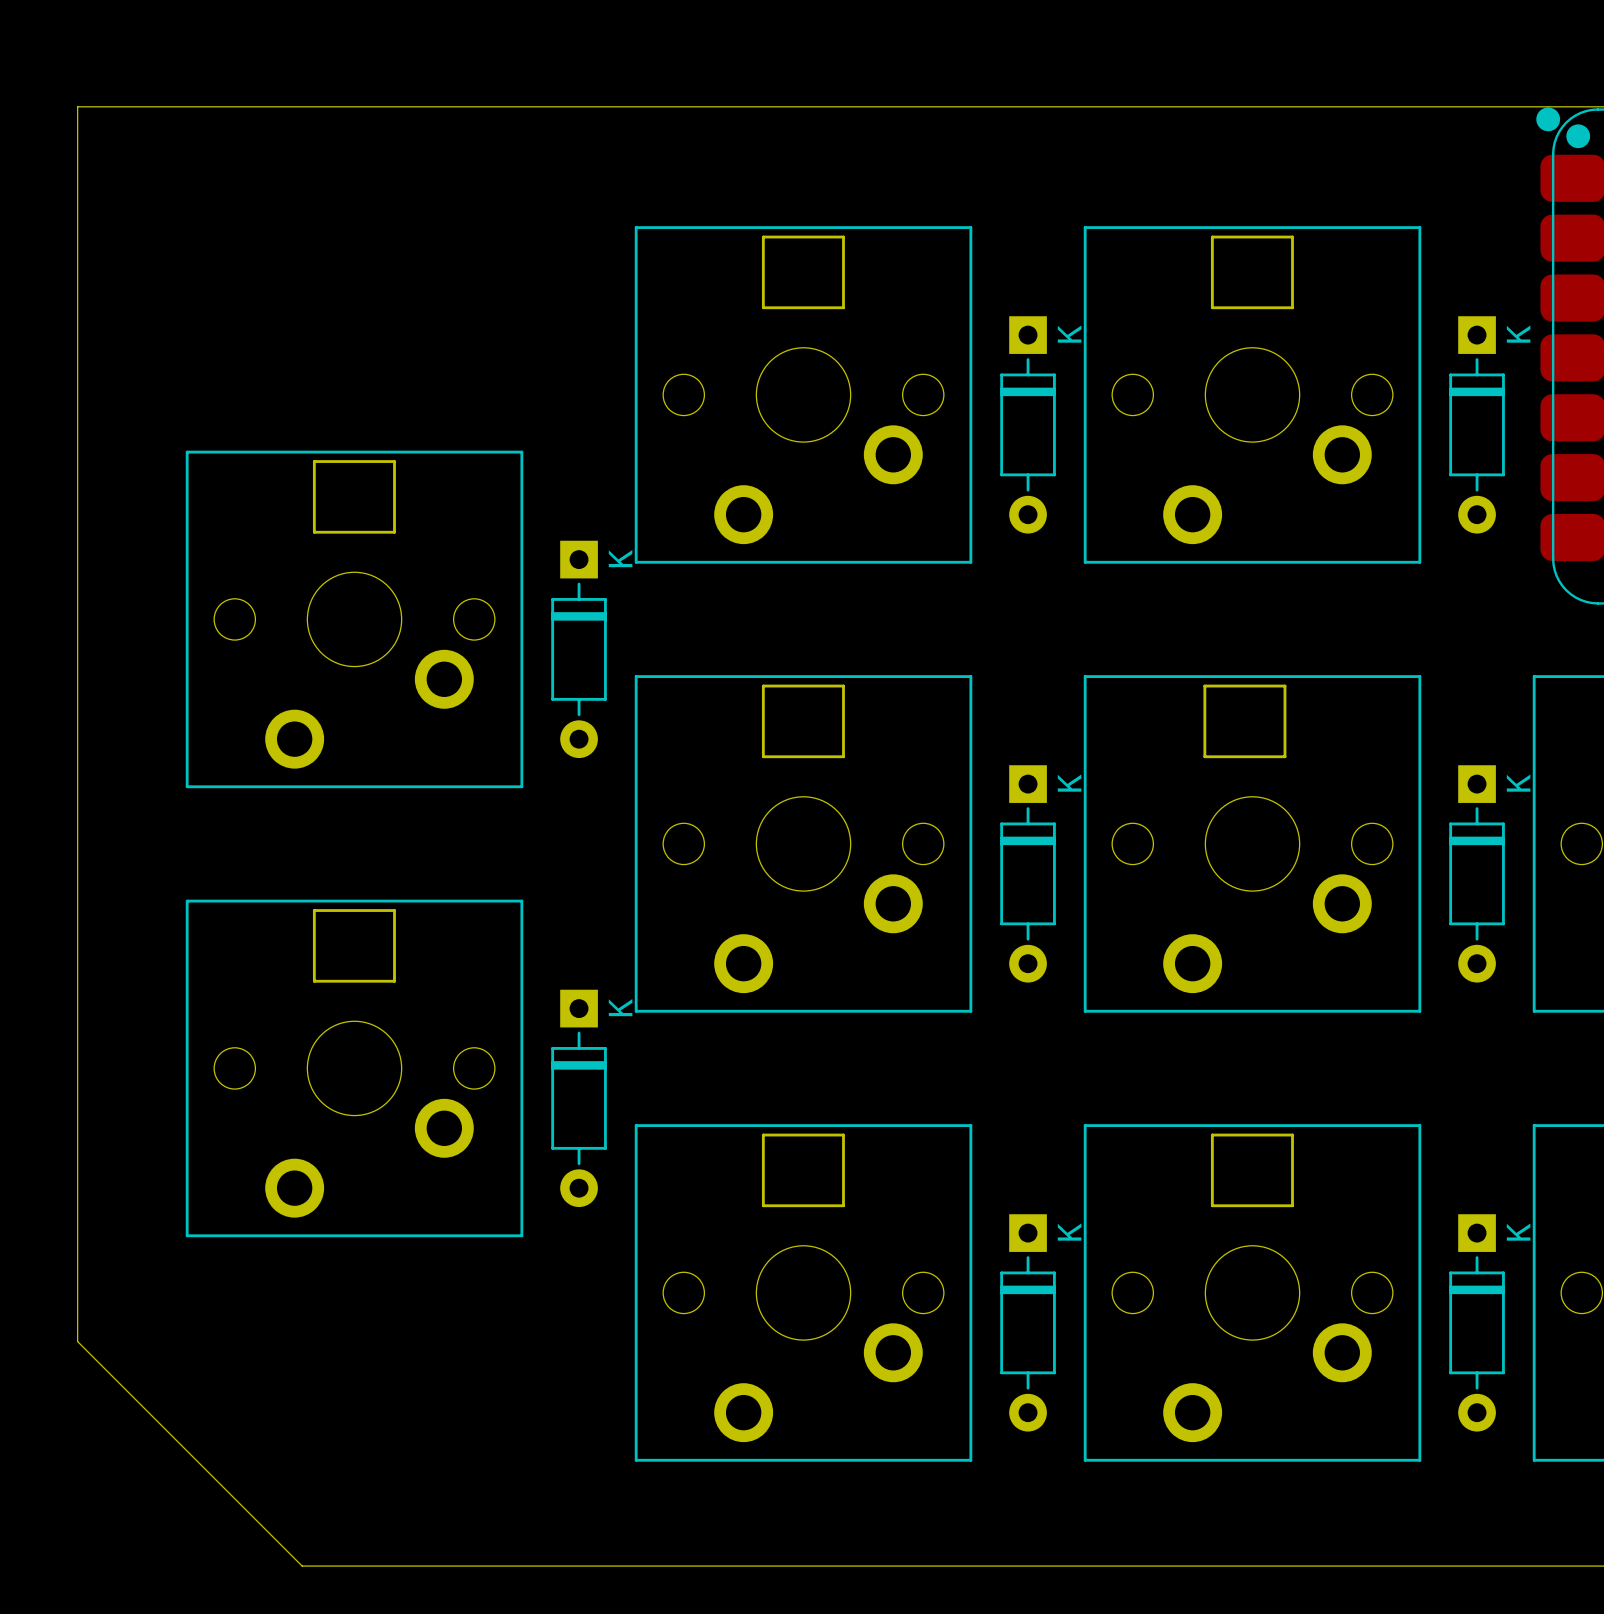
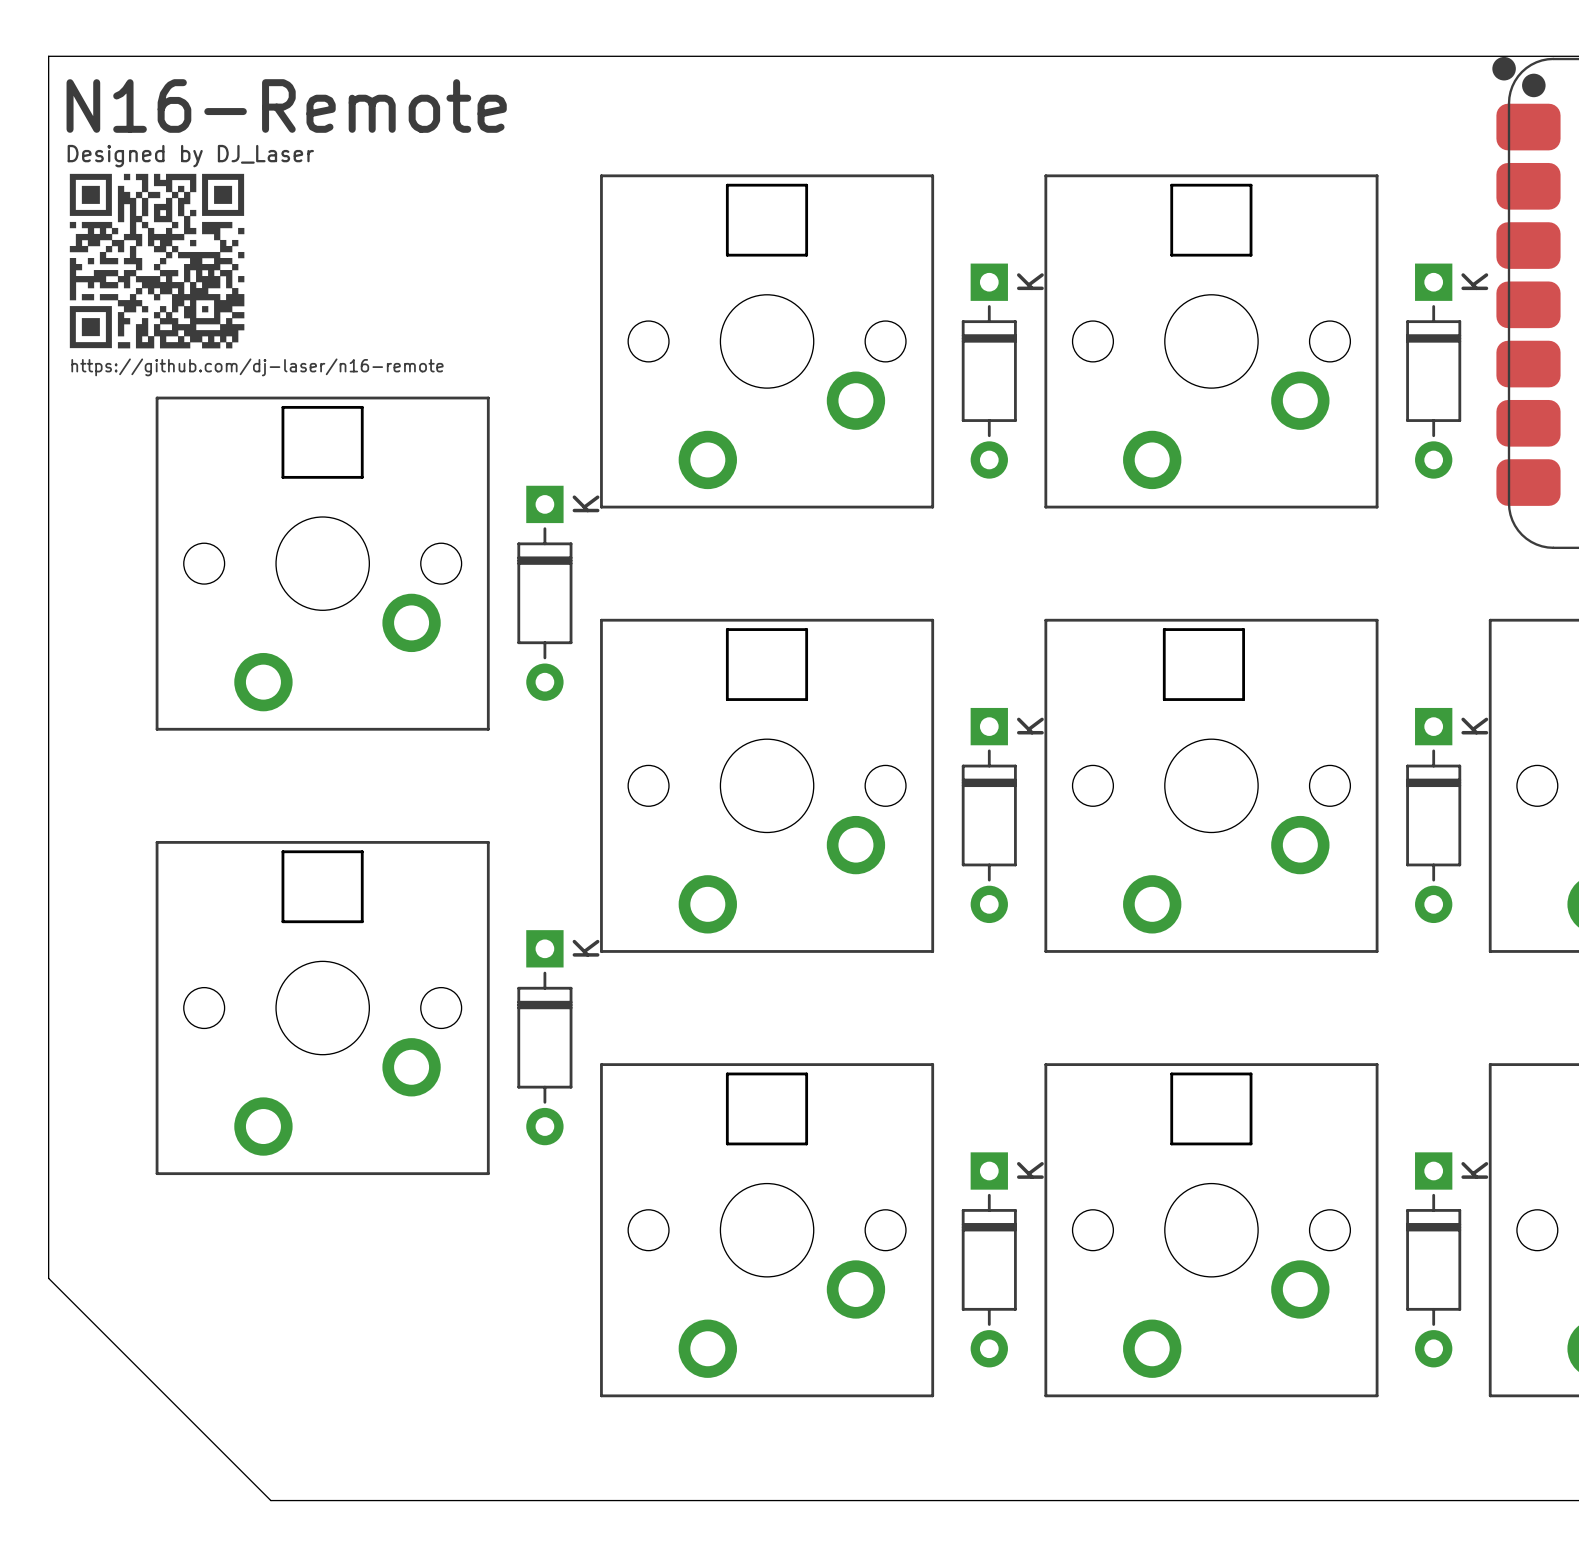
text: none -> N16-Remote (286, 105)
text: none -> Designed by DJ_Laser (190, 156)
drawing: none -> [69, 173, 245, 349]
text: none -> https://github.com/dj-laser/n16-remote (257, 367)

